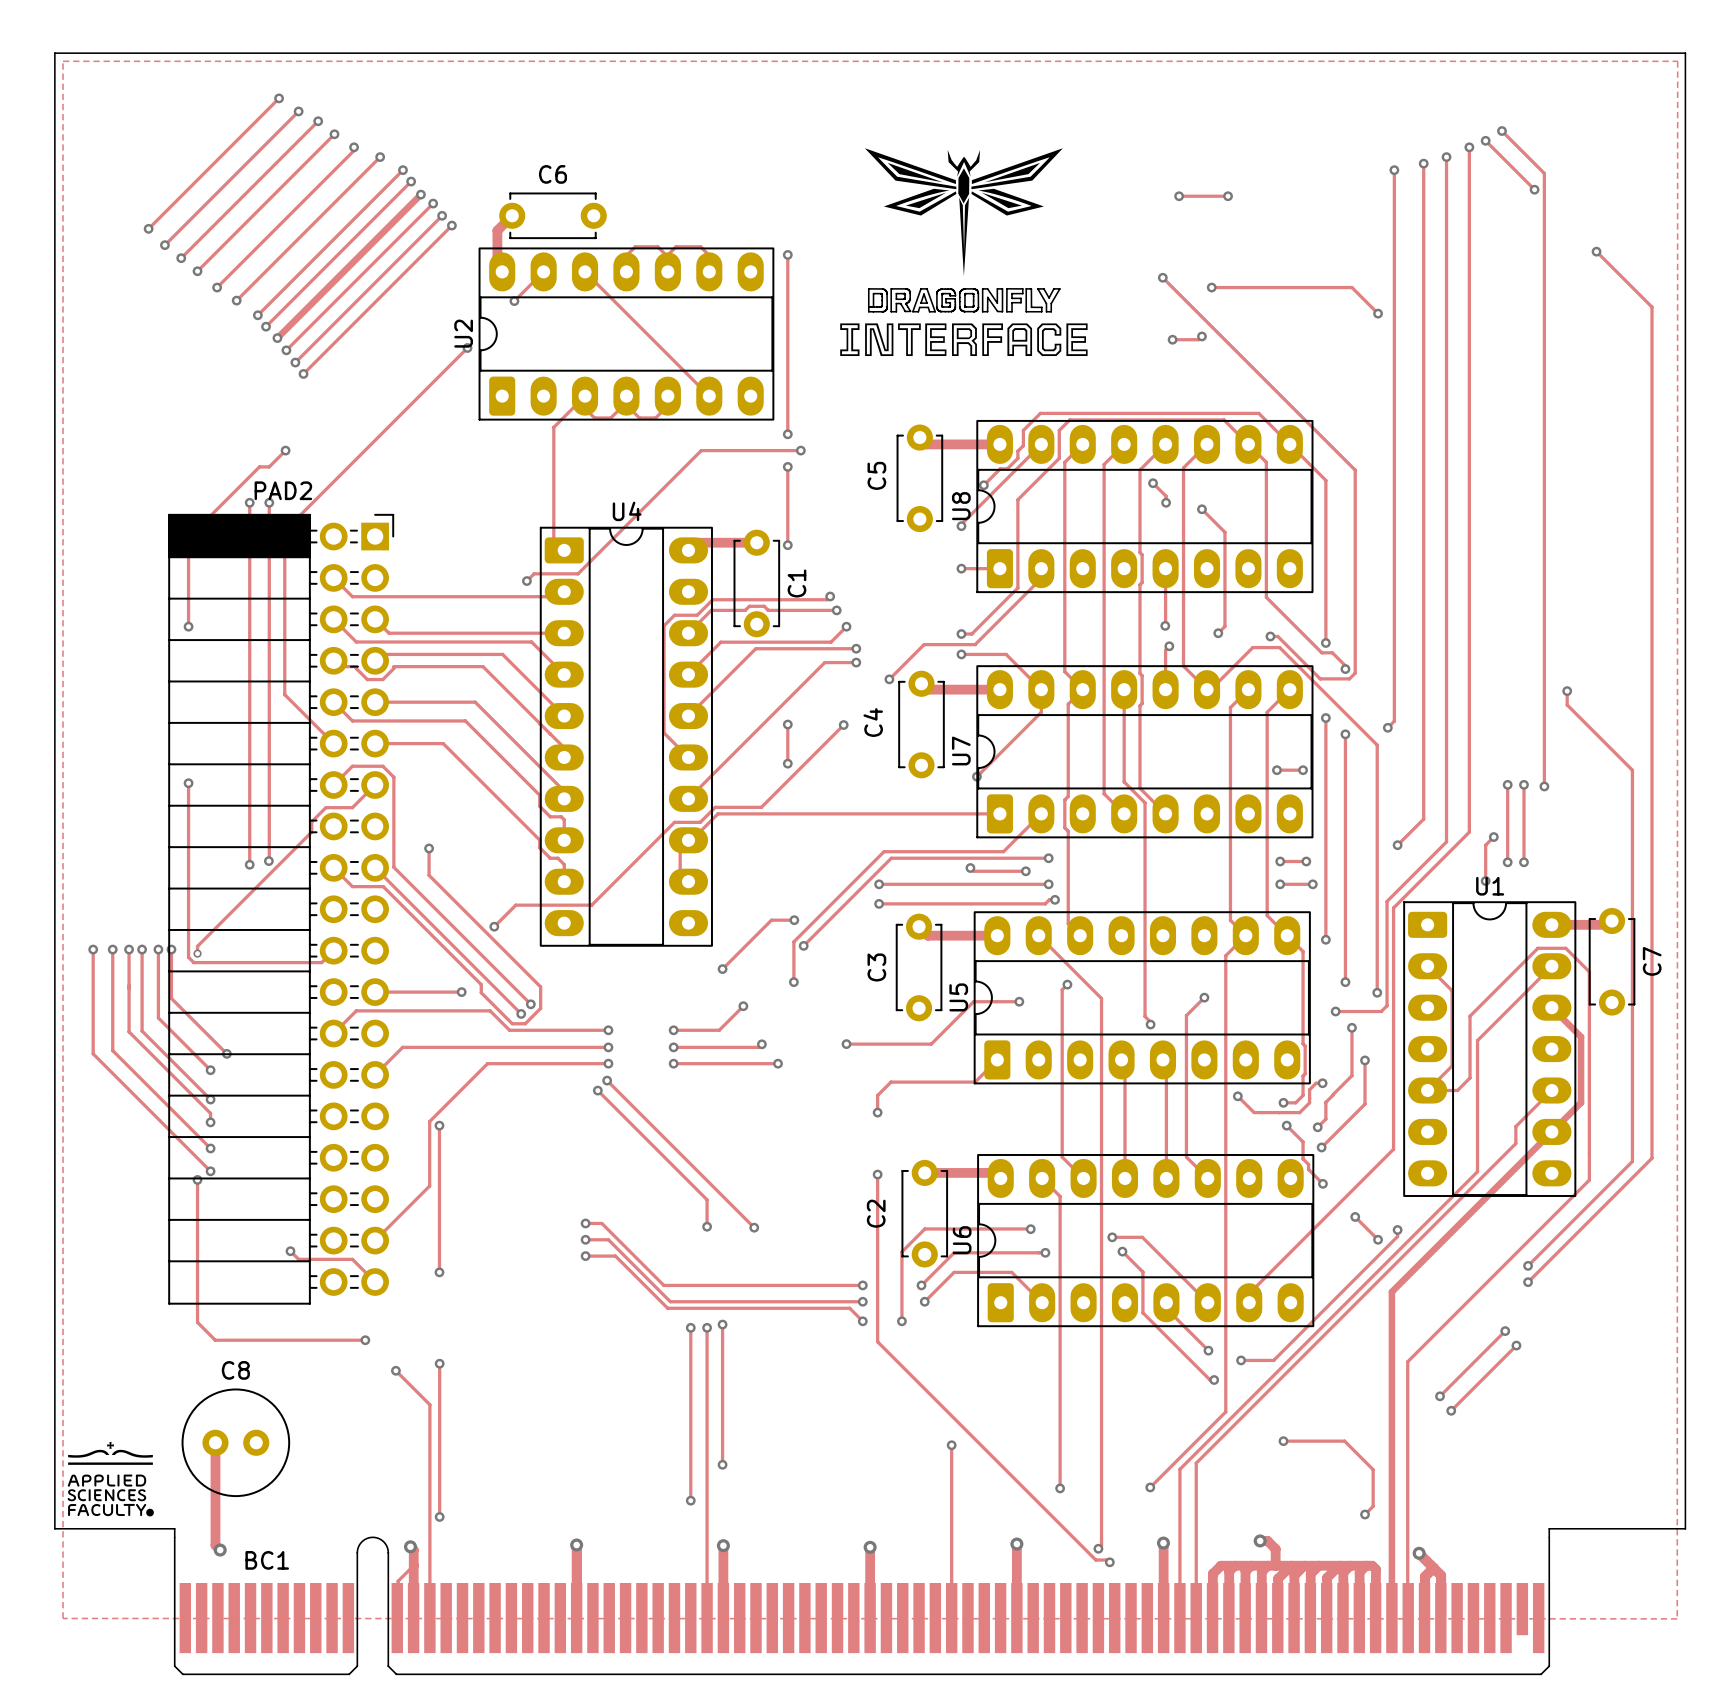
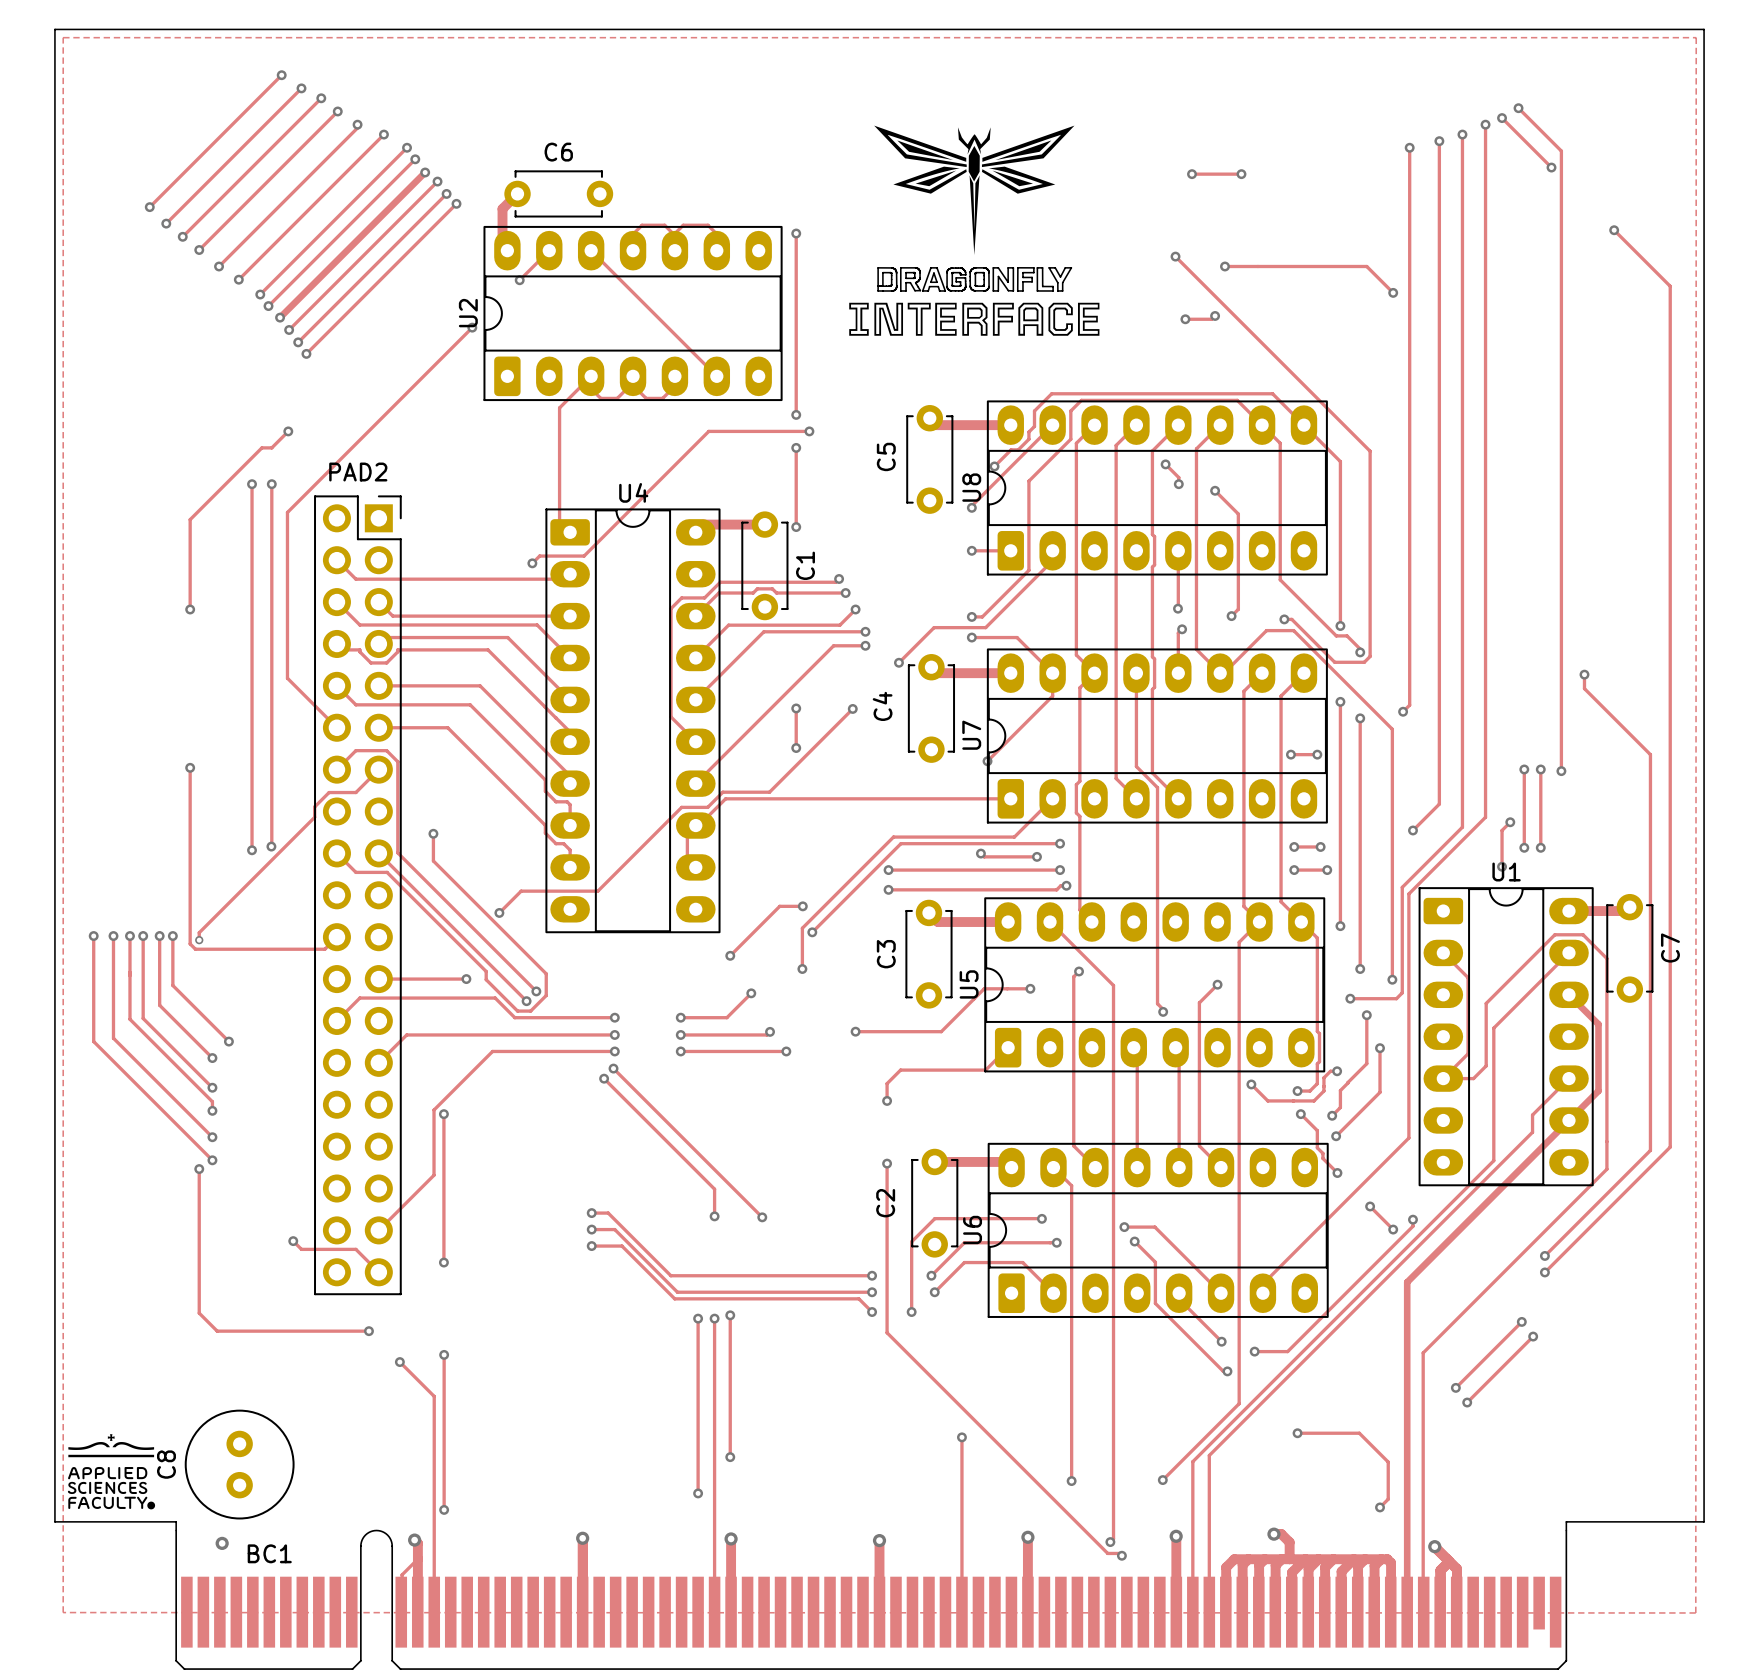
PAD2 footprint: [168, 513, 395, 1305] -> [314, 495, 402, 1296]
C8 name position: C8 (235, 1370) -> C8 (166, 1464)
track: (215, 1442) (215, 1545) (220, 1550) -> none
C8 rotation: 0° (235, 1442) -> 90° clockwise (239, 1464)

